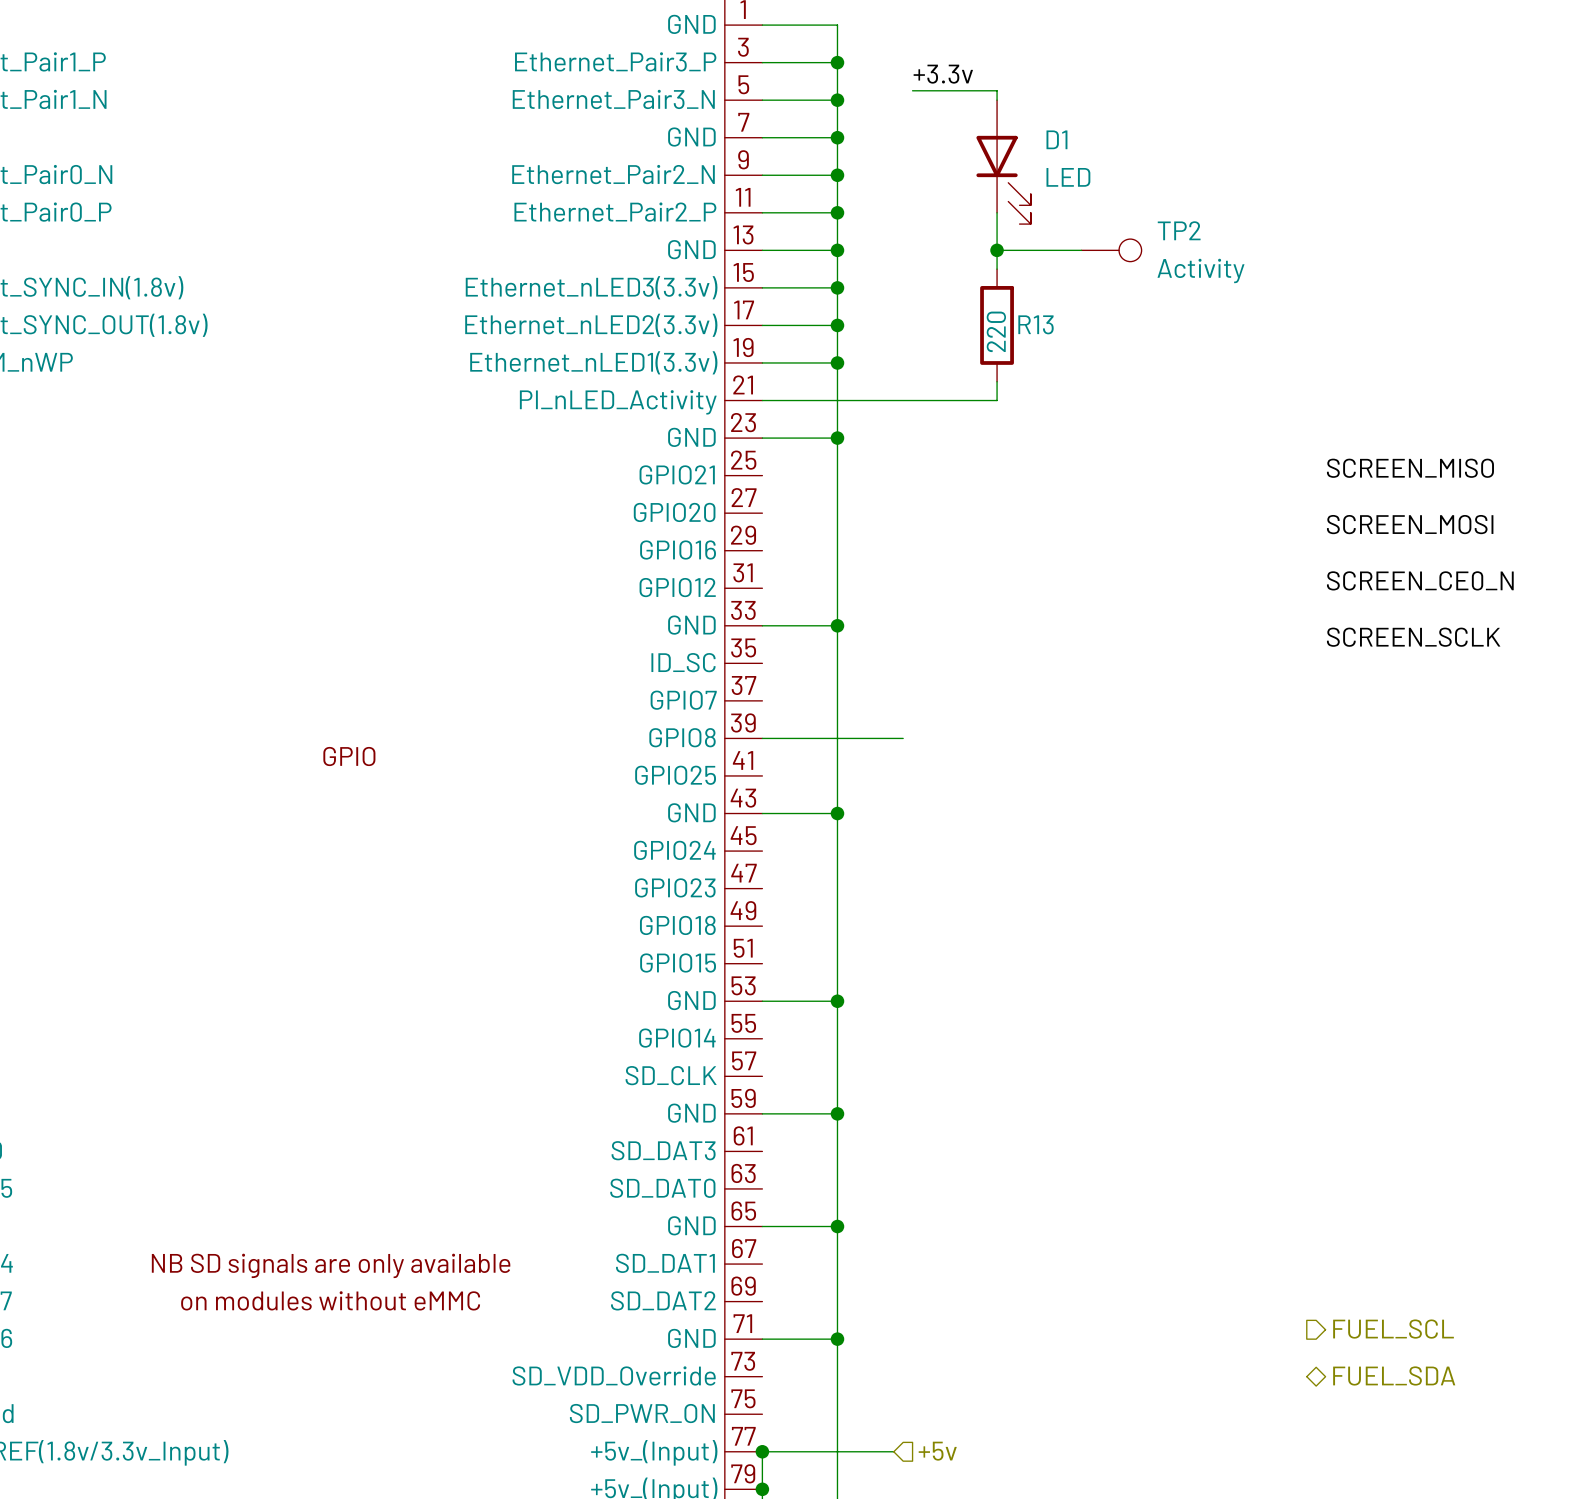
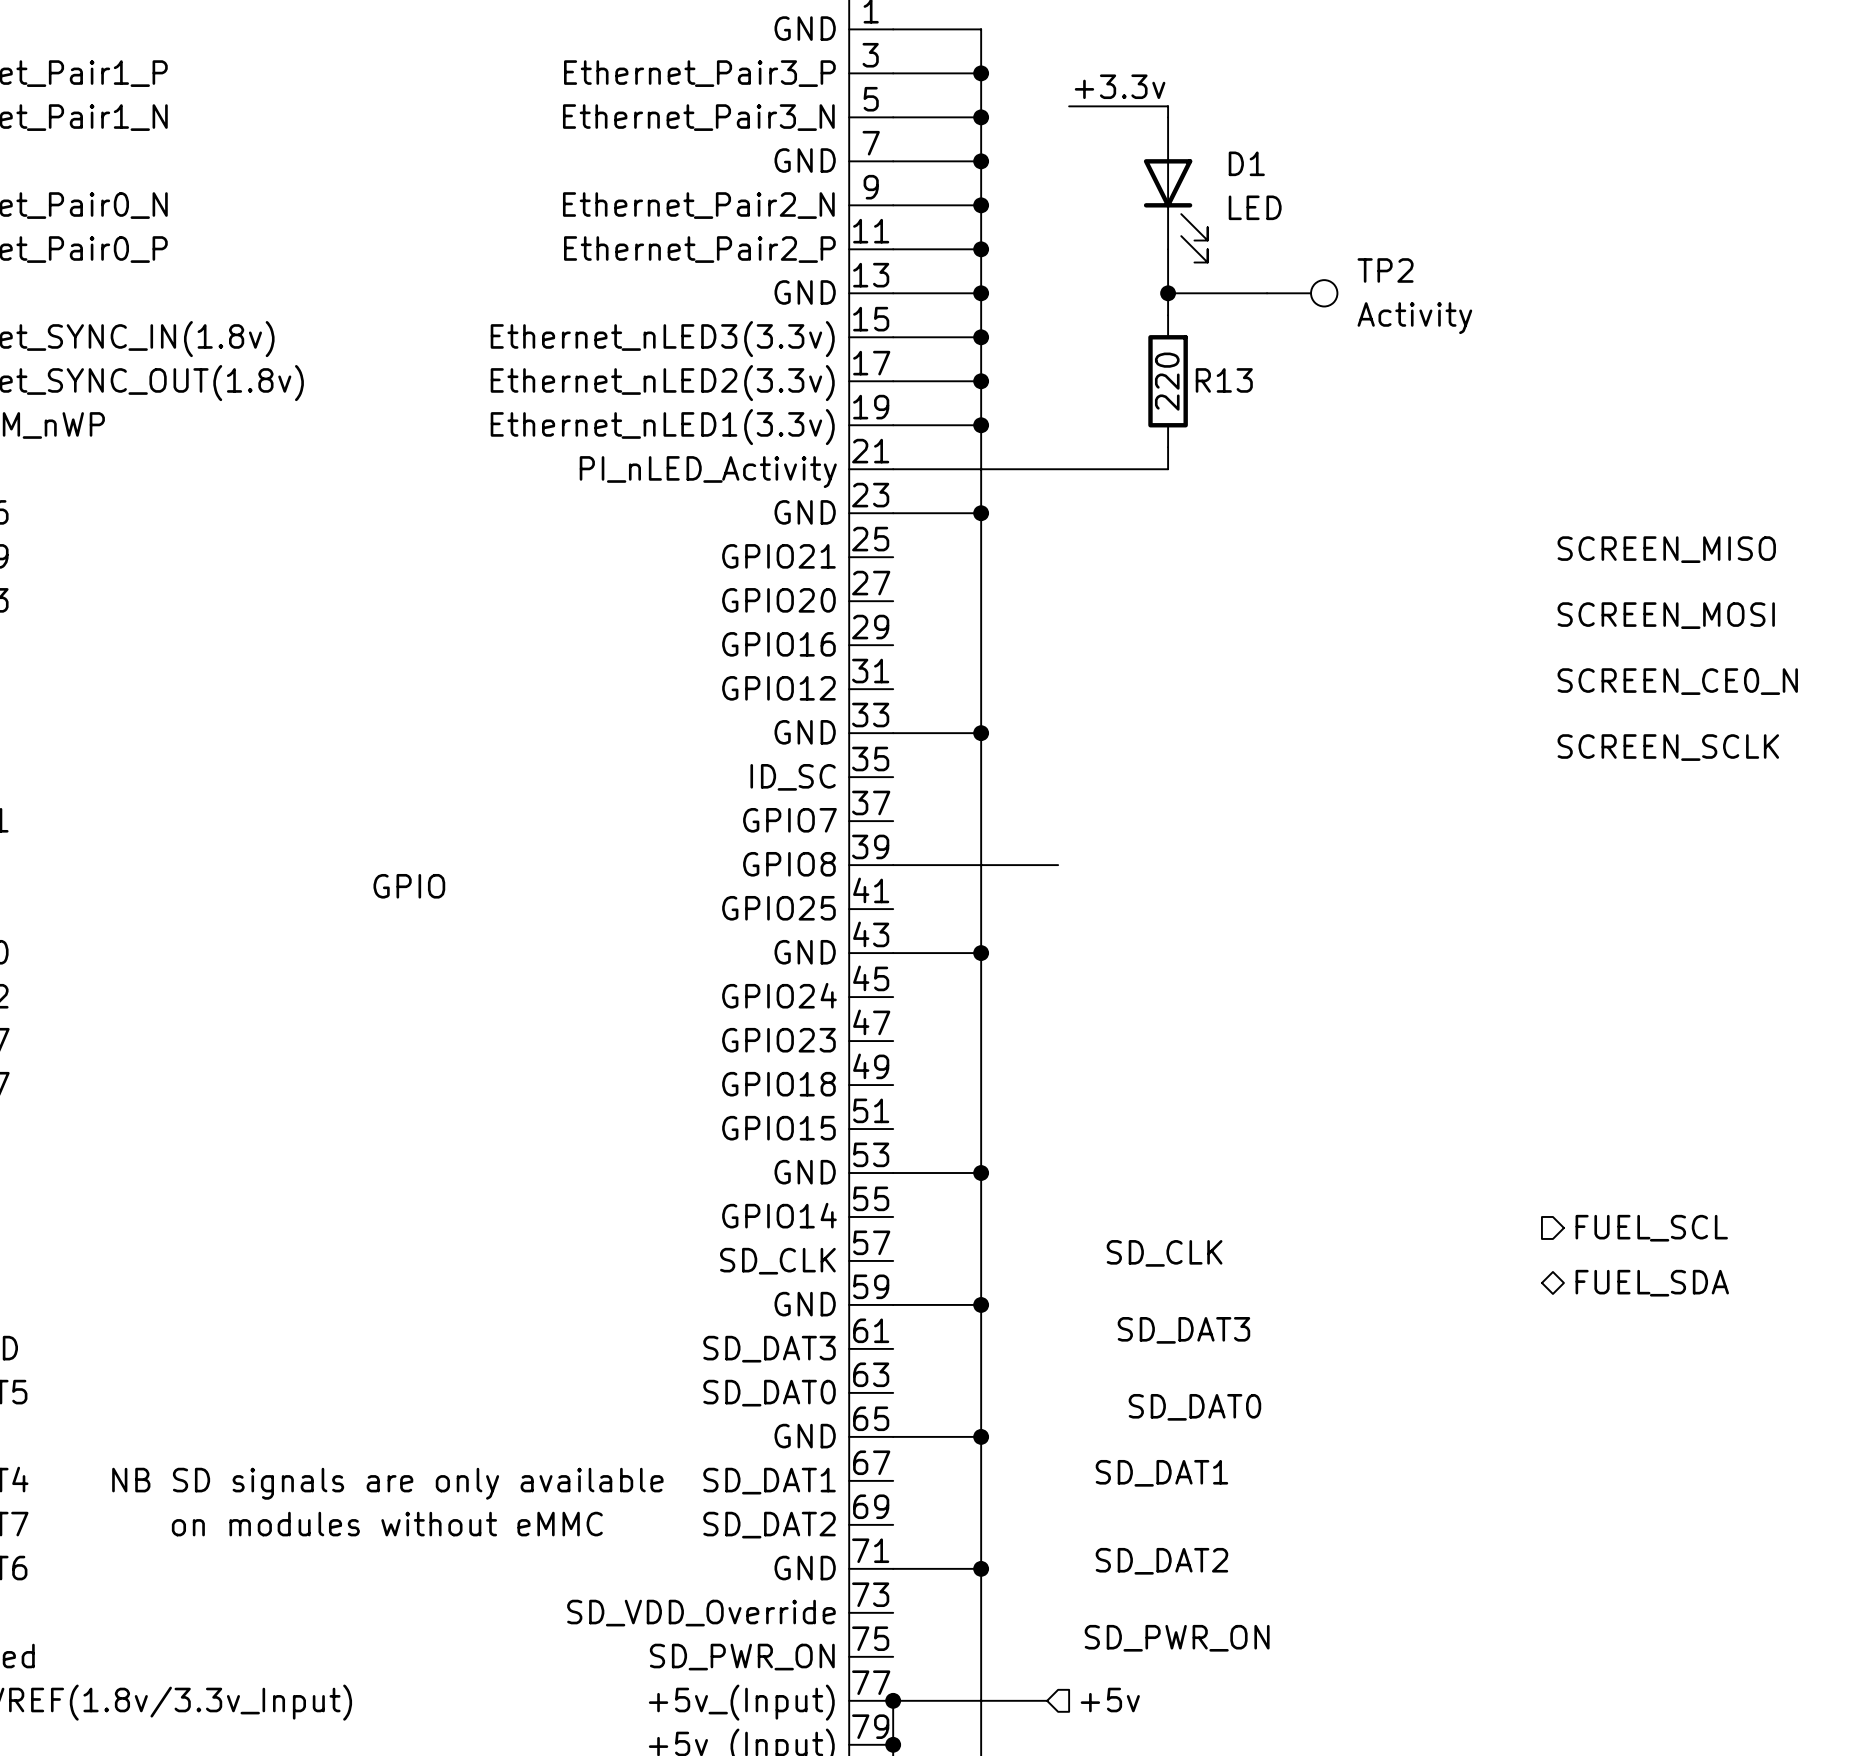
label: none -> SD_CLK (1164, 1253)
label: none -> SD_DAT3 (1183, 1330)
label: none -> SD_DAT0 (1194, 1407)
label: none -> SD_DAT1 (1161, 1473)
hierarchical label position: FUEL_SCL (1393, 1329) -> FUEL_SCL (1651, 1228)
label: none -> SD_DAT2 (1161, 1561)
hierarchical label position: FUEL_SDA (1394, 1375) -> FUEL_SDA (1652, 1283)
label: none -> SD_PWR_ON (1177, 1638)

